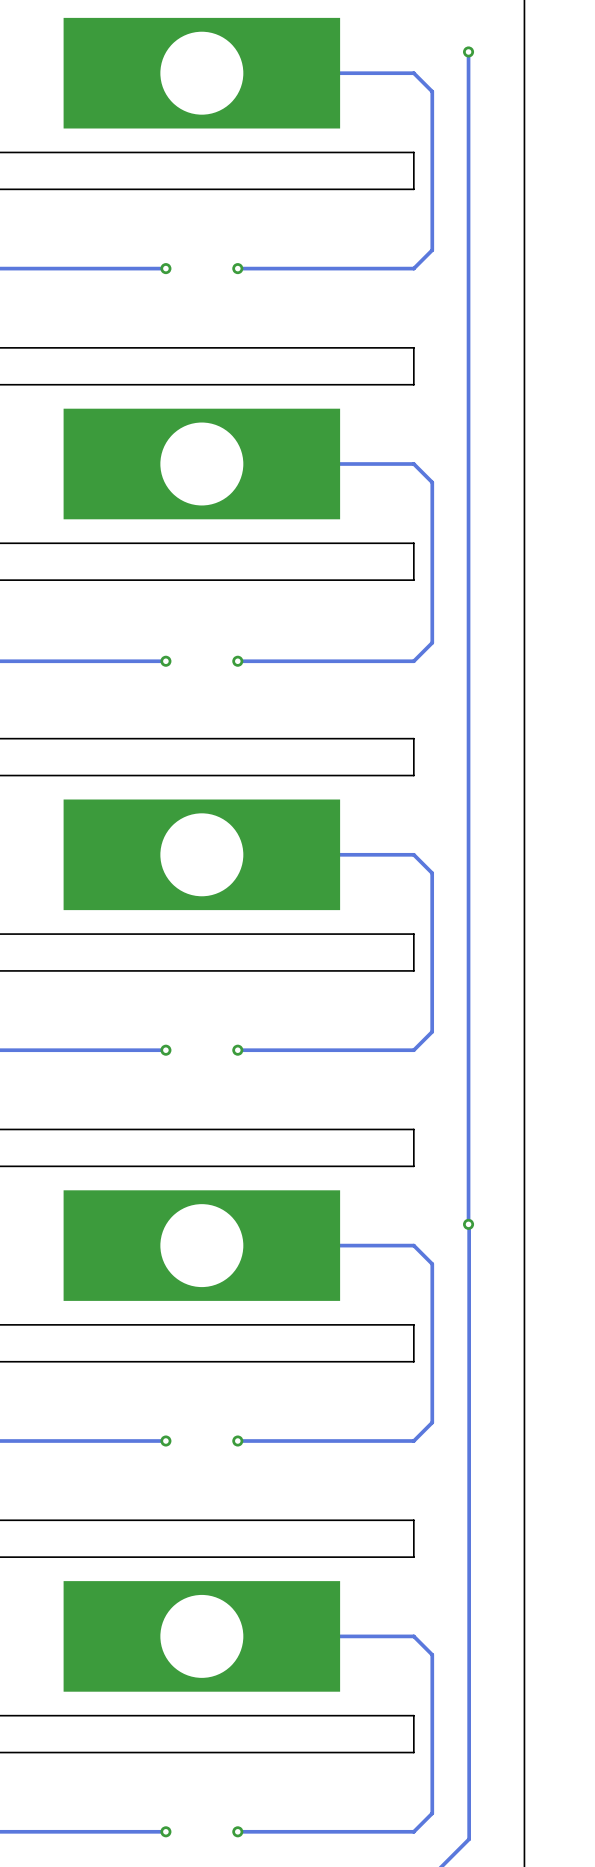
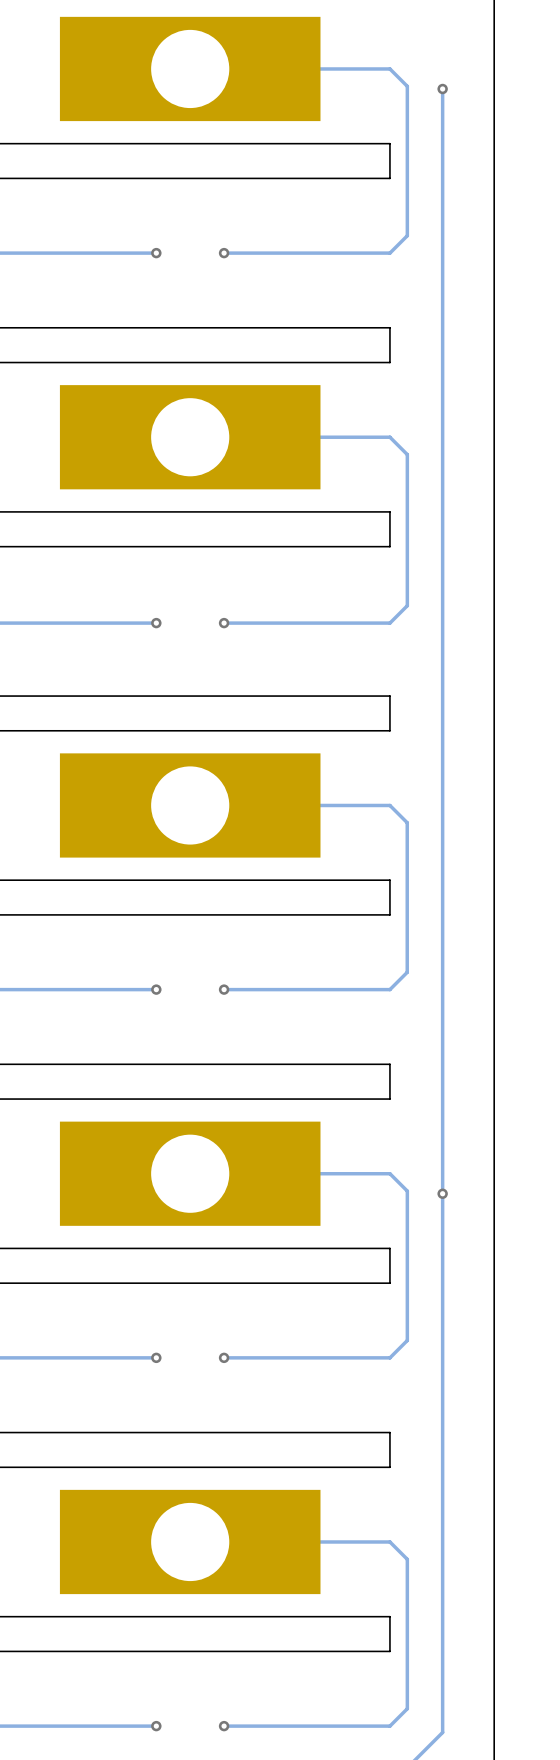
track: (468, 51) (469, 1839) -> (442, 88) (442, 1733)
via position: (468, 51) -> (442, 88)
via position: (468, 1224) -> (442, 1193)

